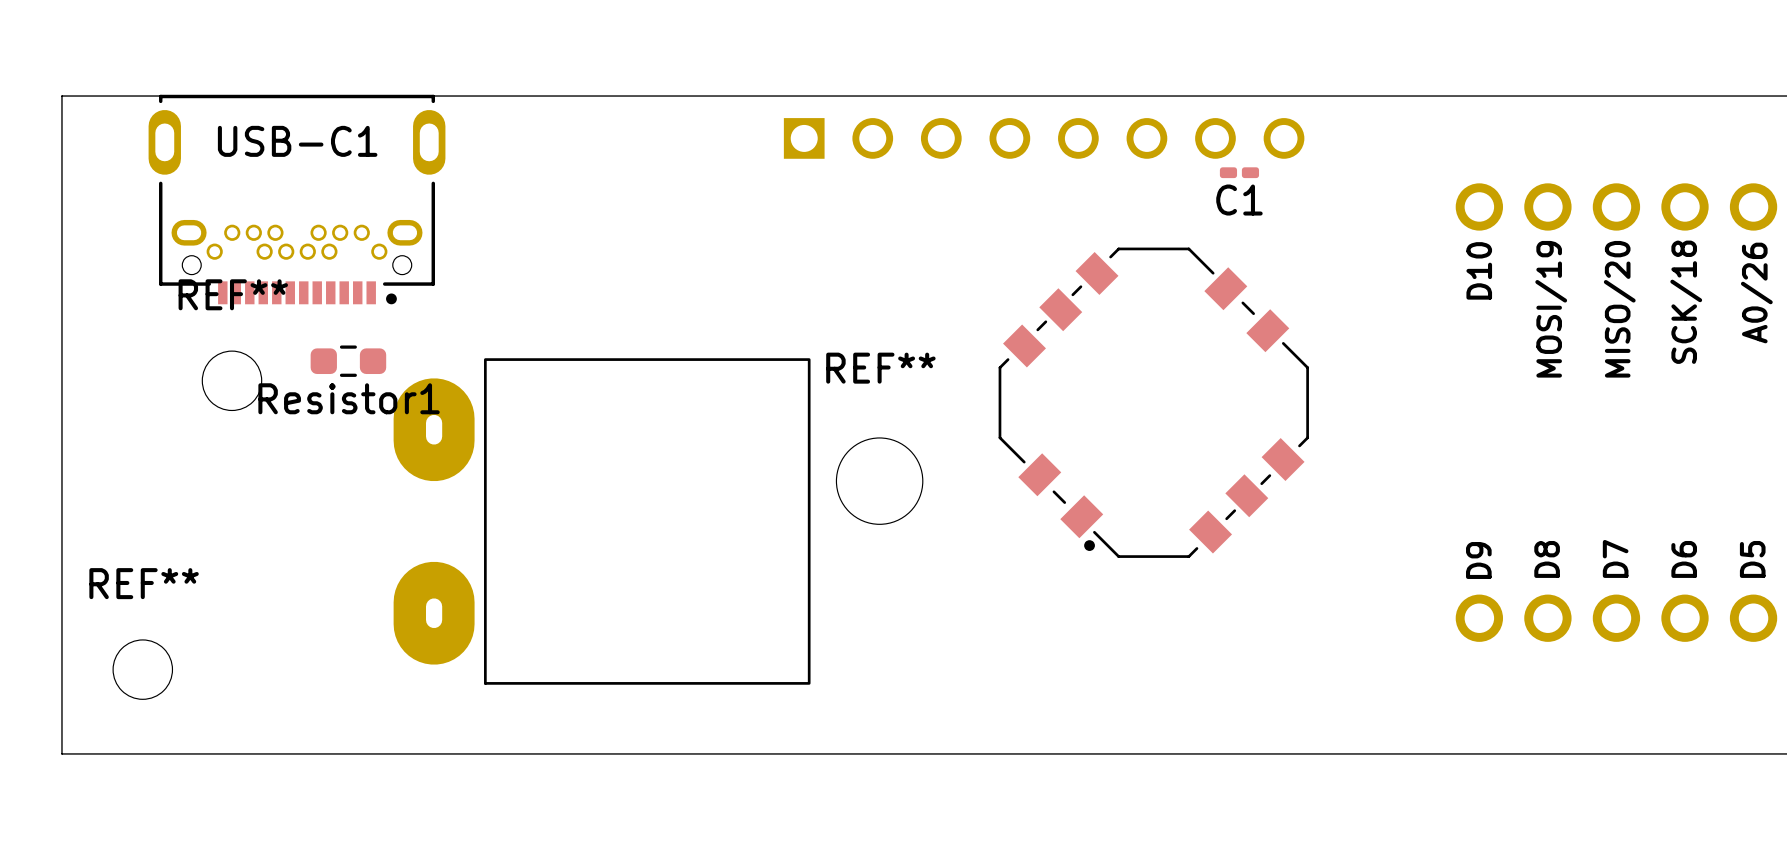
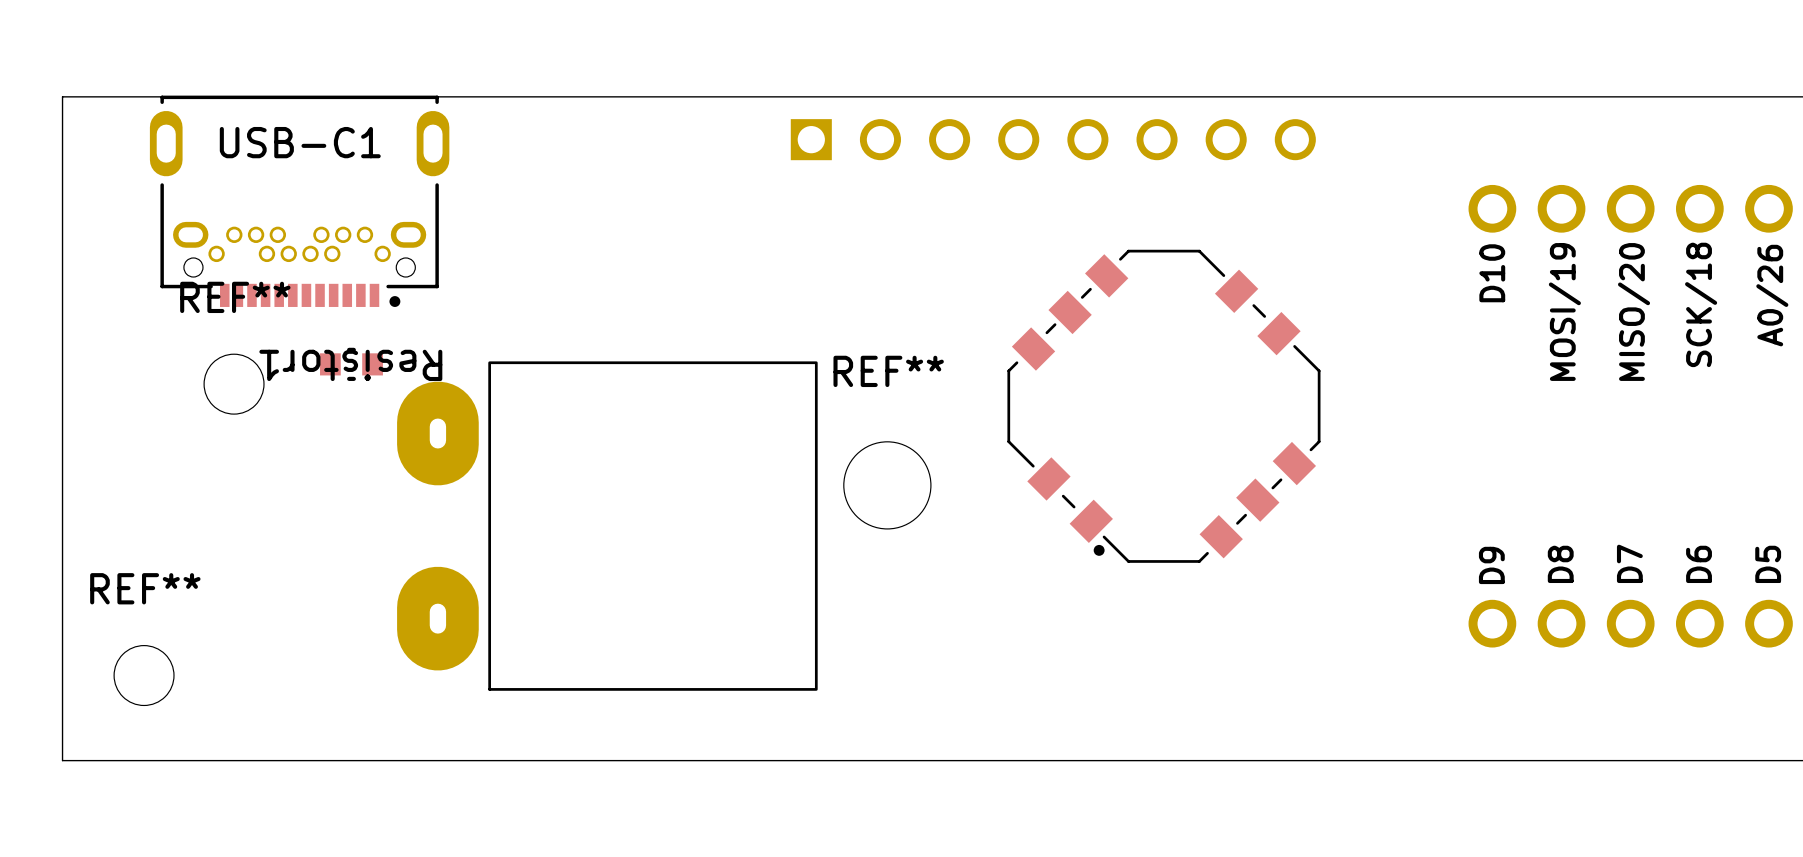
C1: (1239, 172) -> none
Resistor1 footprint: [310, 345, 387, 377] -> [320, 347, 383, 381]
Resistor1 name rotation: 0° (349, 398) -> 180° (350, 365)

